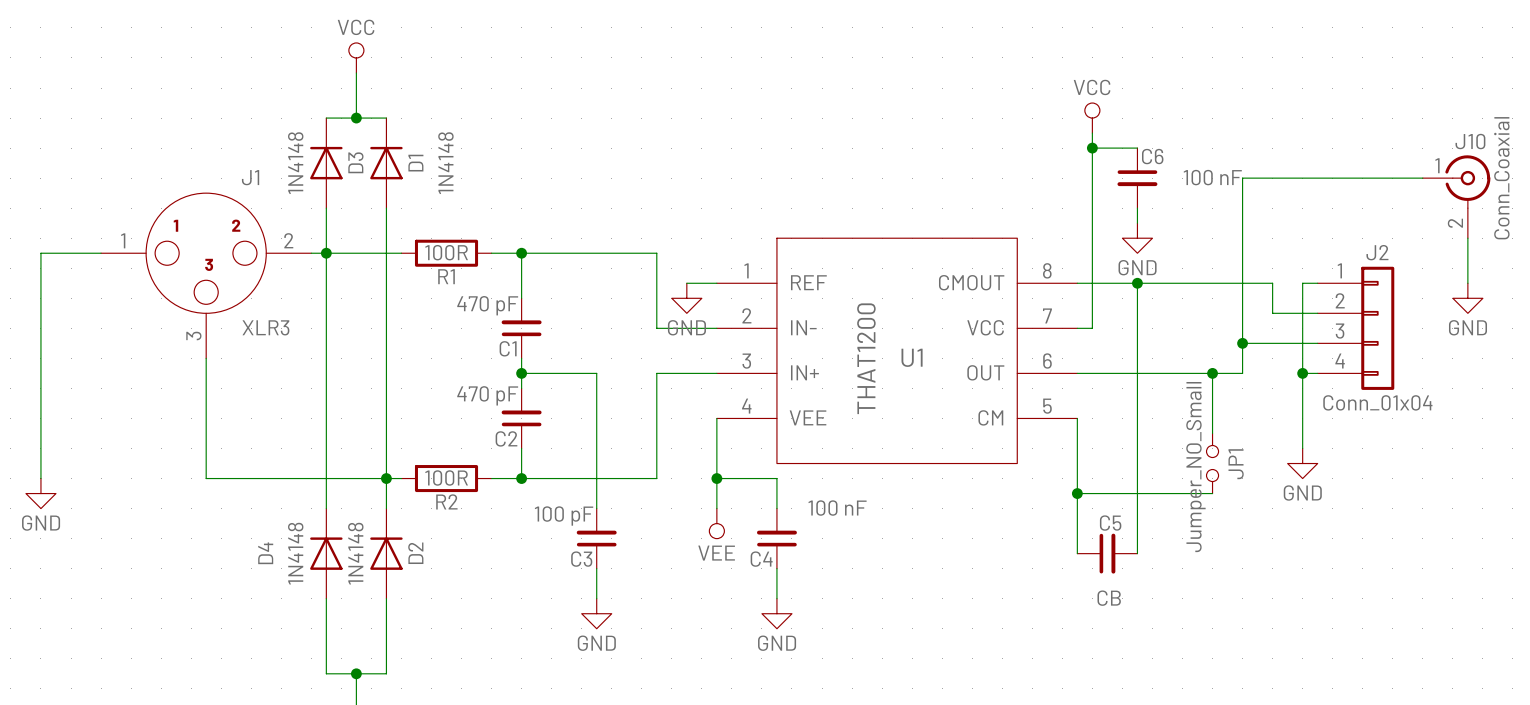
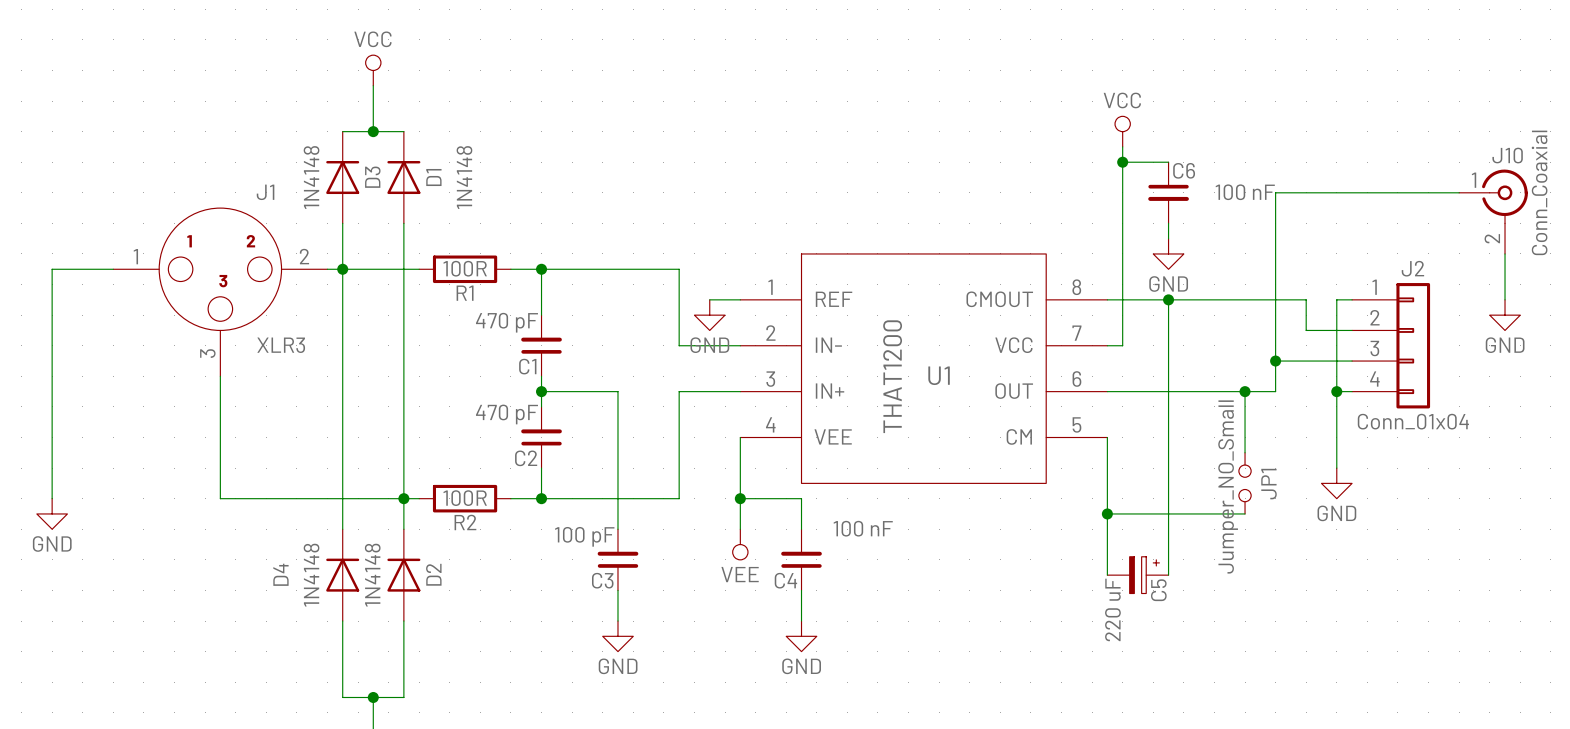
C5 name position: C5 (1110, 523) -> C5 (1158, 590)
C5 symbol: [1077, 533, 1138, 574] -> [1107, 556, 1169, 594]
C5 value: CB (1109, 598) -> 220 uF (1112, 609)

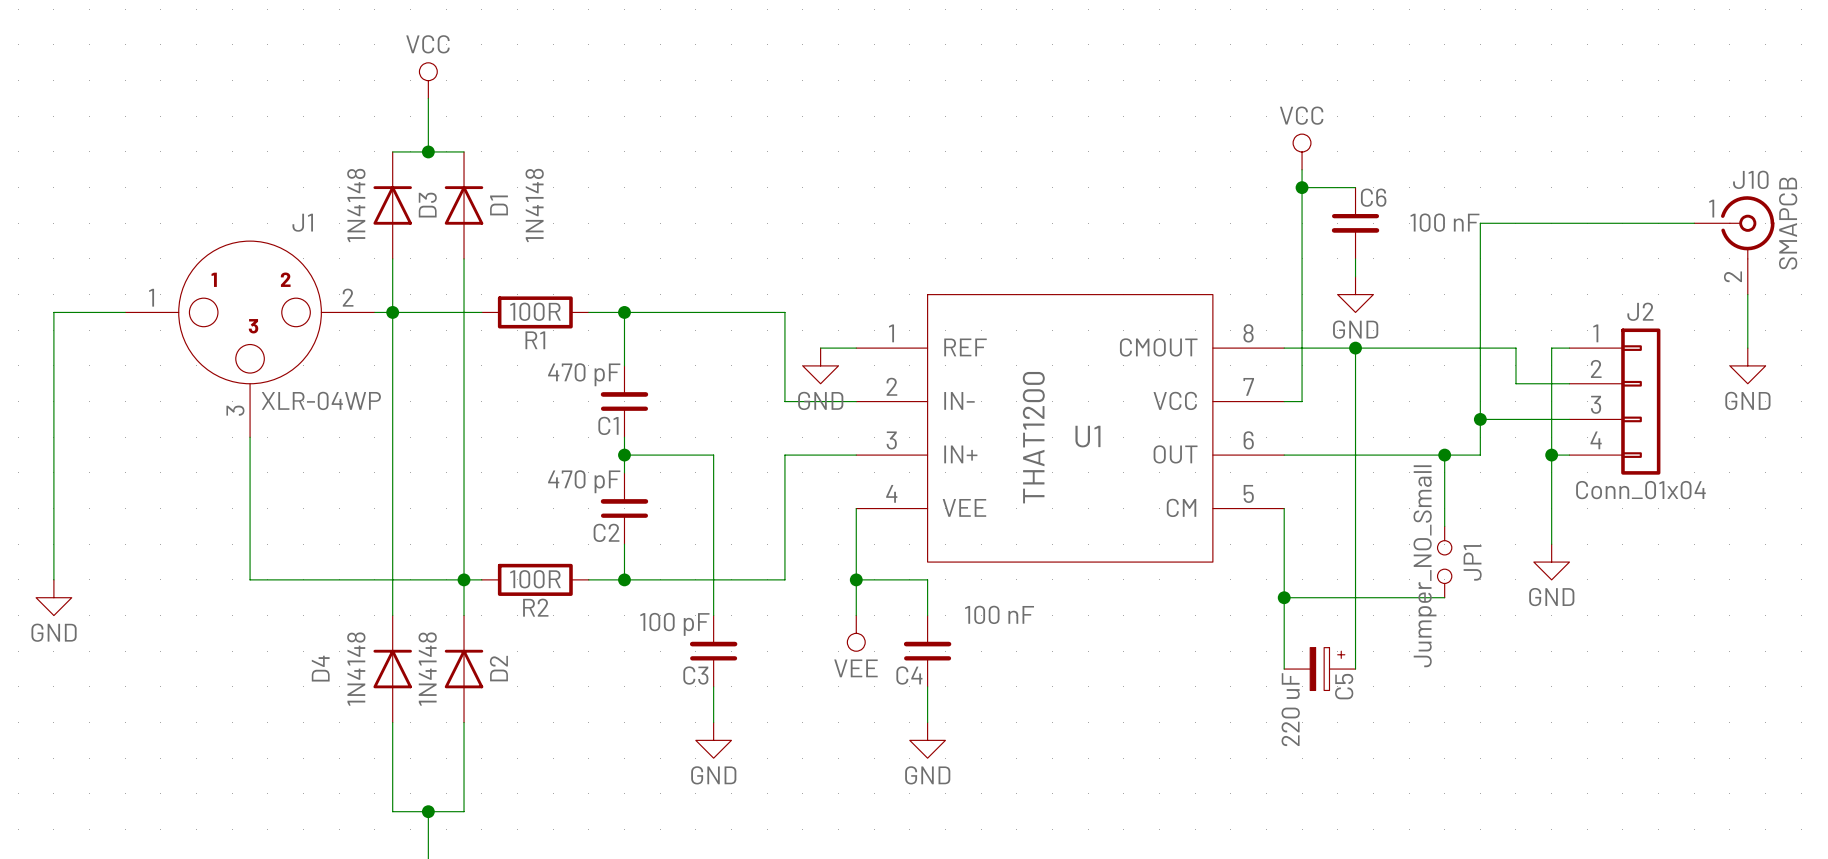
J10 value: Conn_Coaxial (1539, 192) -> SMAPCB (1788, 223)
J1 value: XLR3 (281, 345) -> XLR-04WP (321, 400)

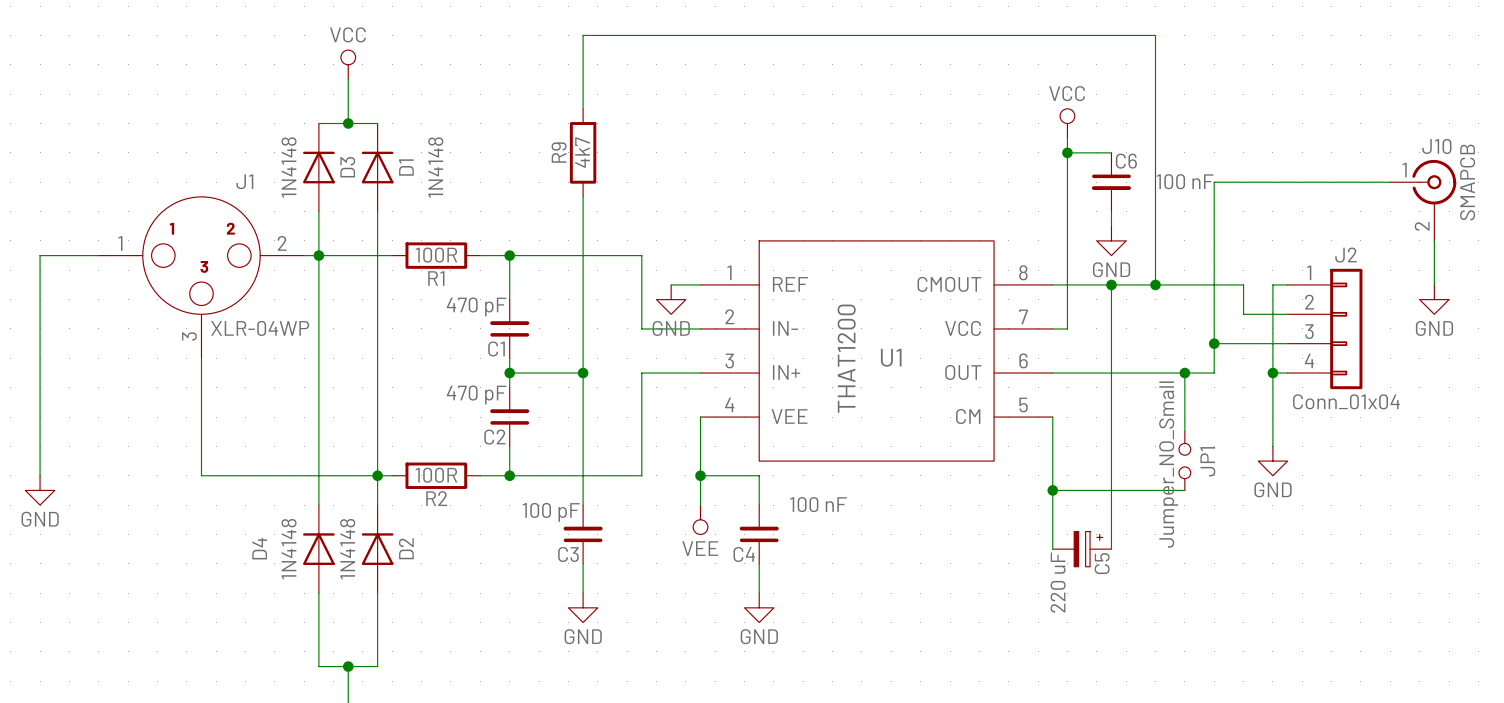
wire: none -> (583, 108) (583, 35) (1155, 35) (1155, 284)
R9: none -> 4k7 (583, 152)
wire: none -> (583, 196) (583, 373)
junction: none -> (1155, 284)
junction: none -> (583, 373)

